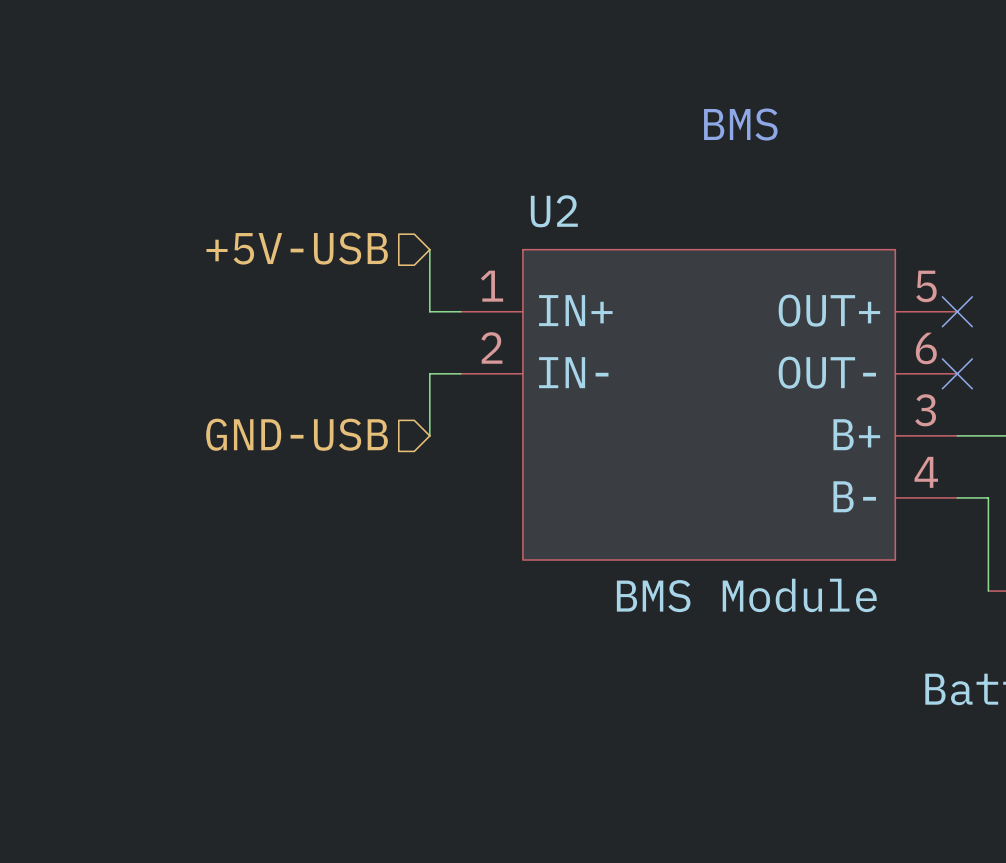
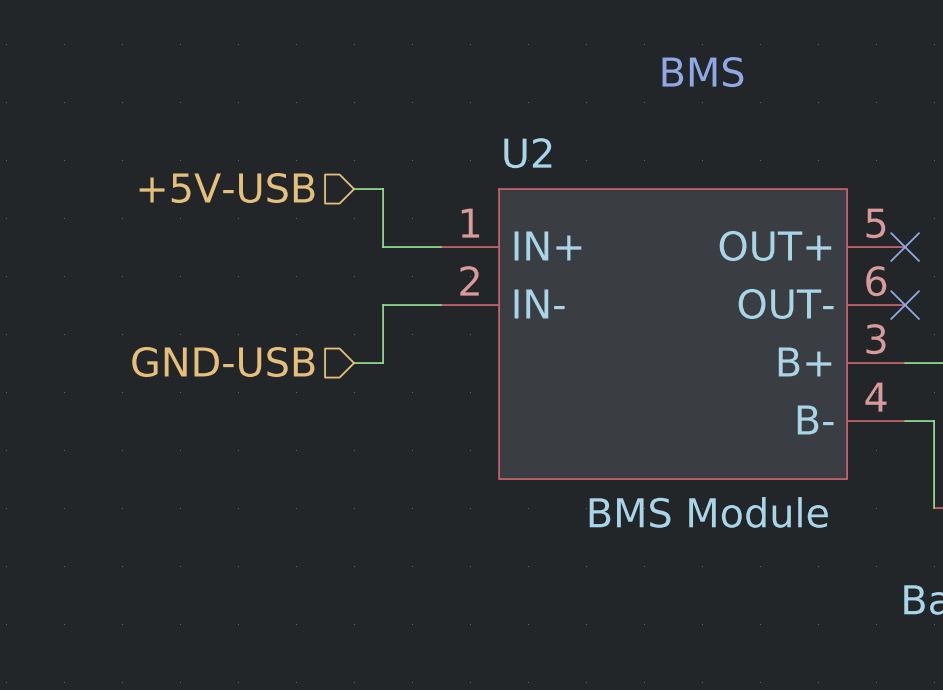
hierarchical label position: +5V-USB (297, 248) -> +5V-USB (227, 187)
wire: (429, 249) (429, 311) -> (354, 189) (383, 189) (383, 247) (412, 247)
wire: (429, 373) (429, 435) -> (412, 305) (383, 305) (383, 363) (354, 363)
hierarchical label position: GND-USB (297, 434) -> GND-USB (223, 361)

